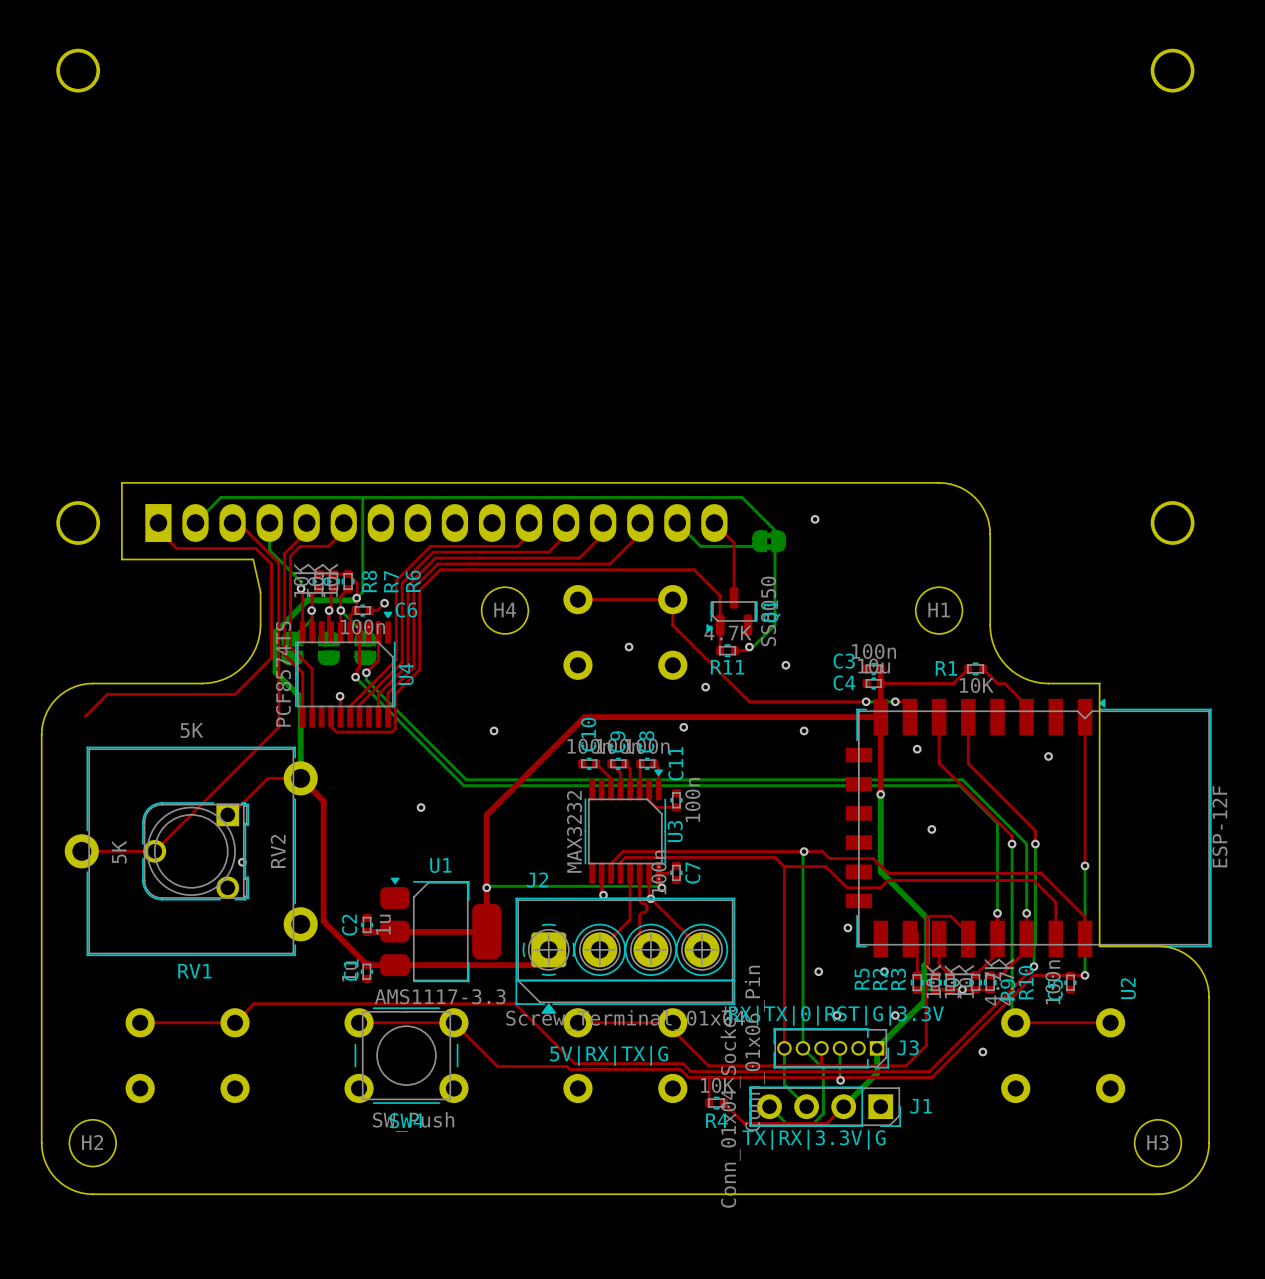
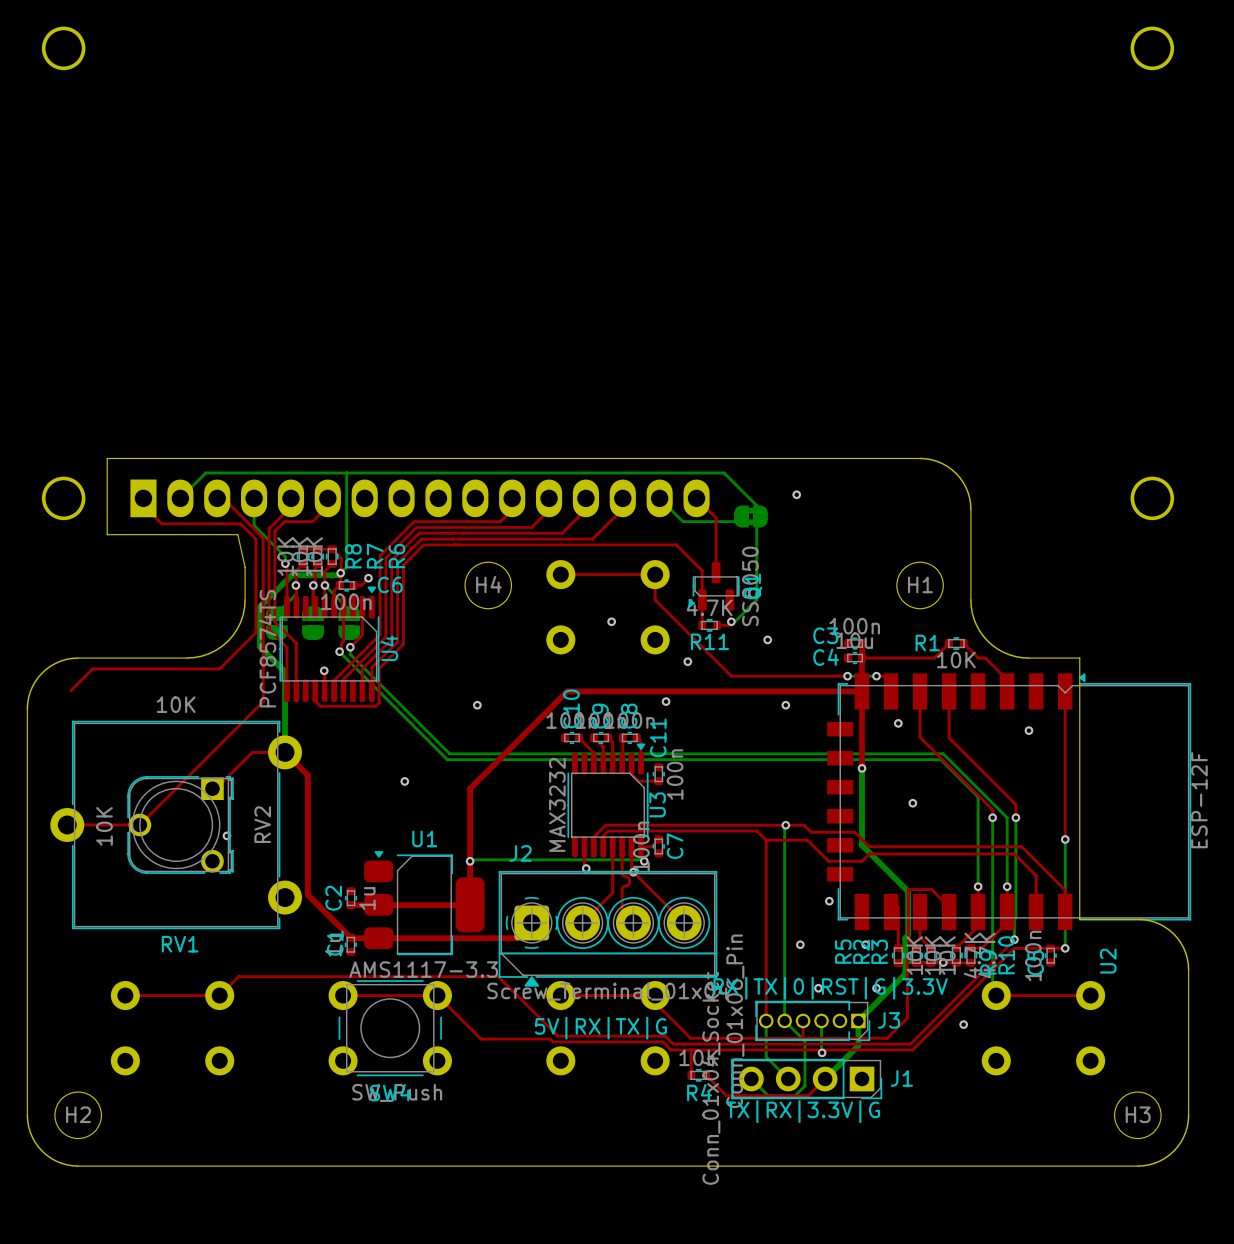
RV2 value: 5K (191, 730) -> 10K (176, 704)
RV1 value: 5K (119, 852) -> 10K (104, 826)

